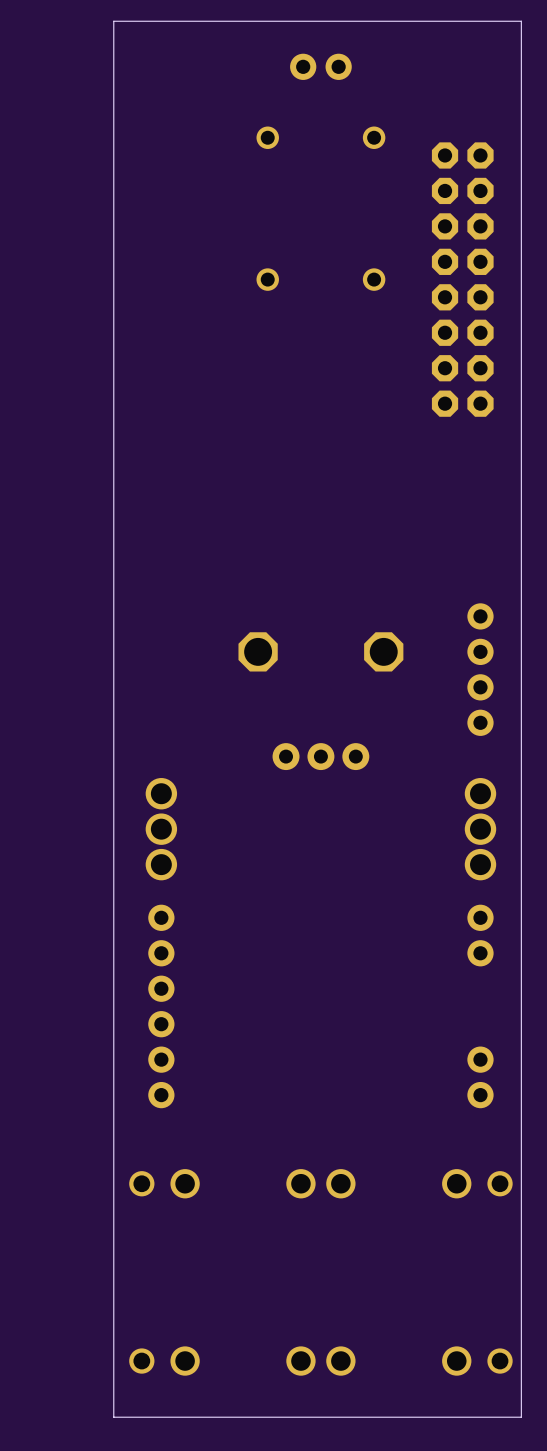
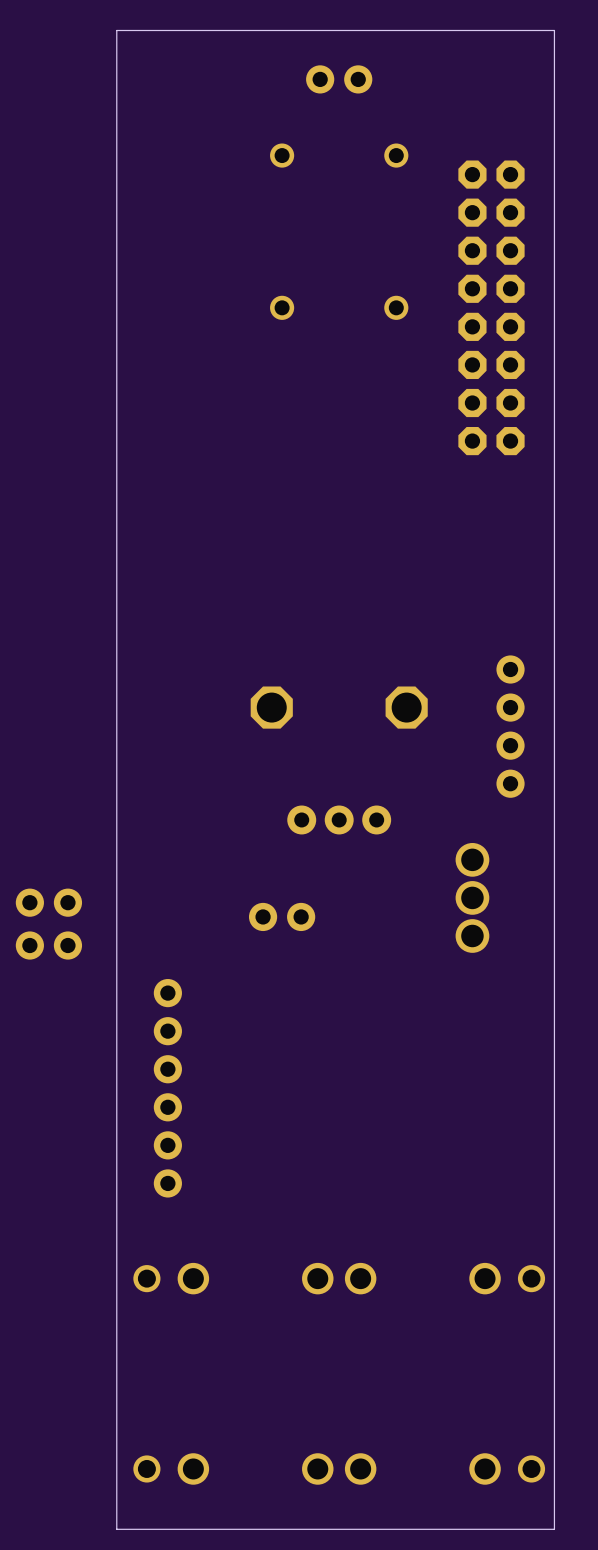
part: (161, 829) -> none
part position: (480, 829) -> (472, 897)
part: none -> (48, 902)
part: none -> (282, 916)
part: none -> (48, 945)
part: (480, 935) -> none
part: (480, 1077) -> none

